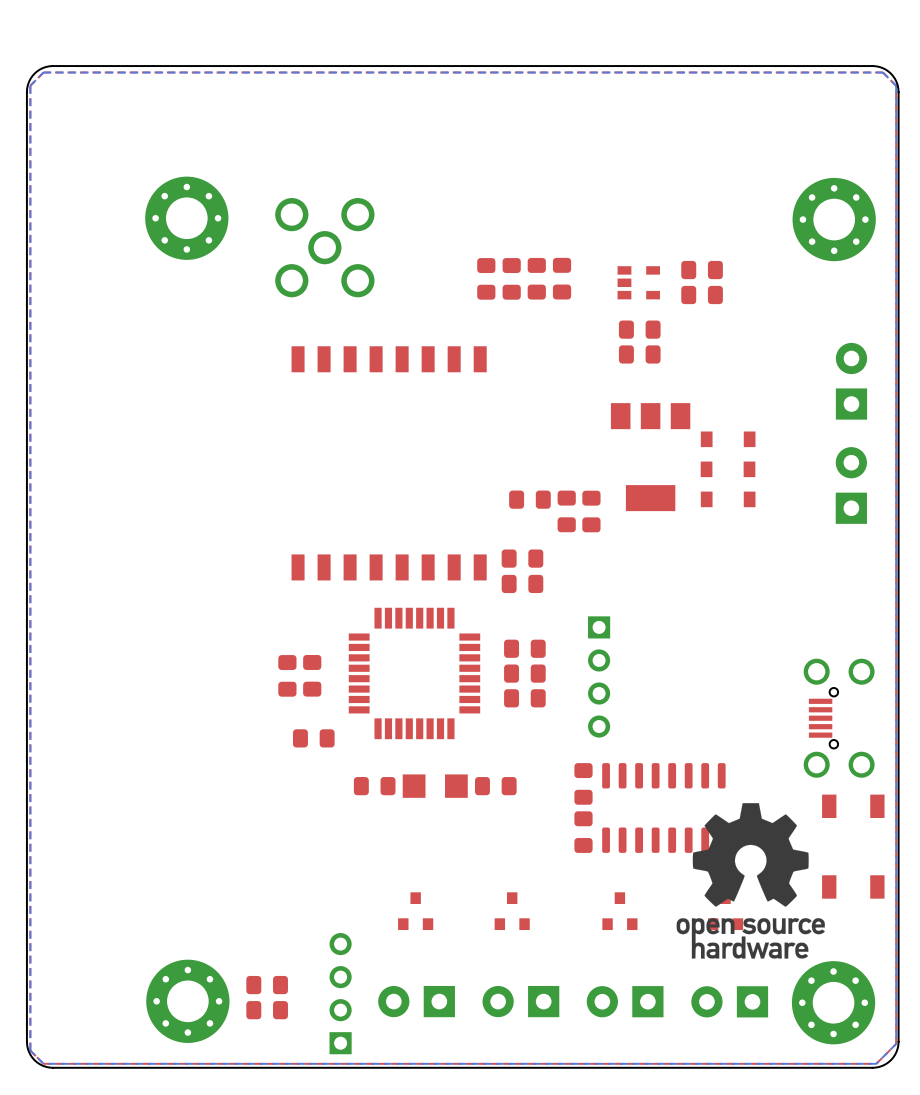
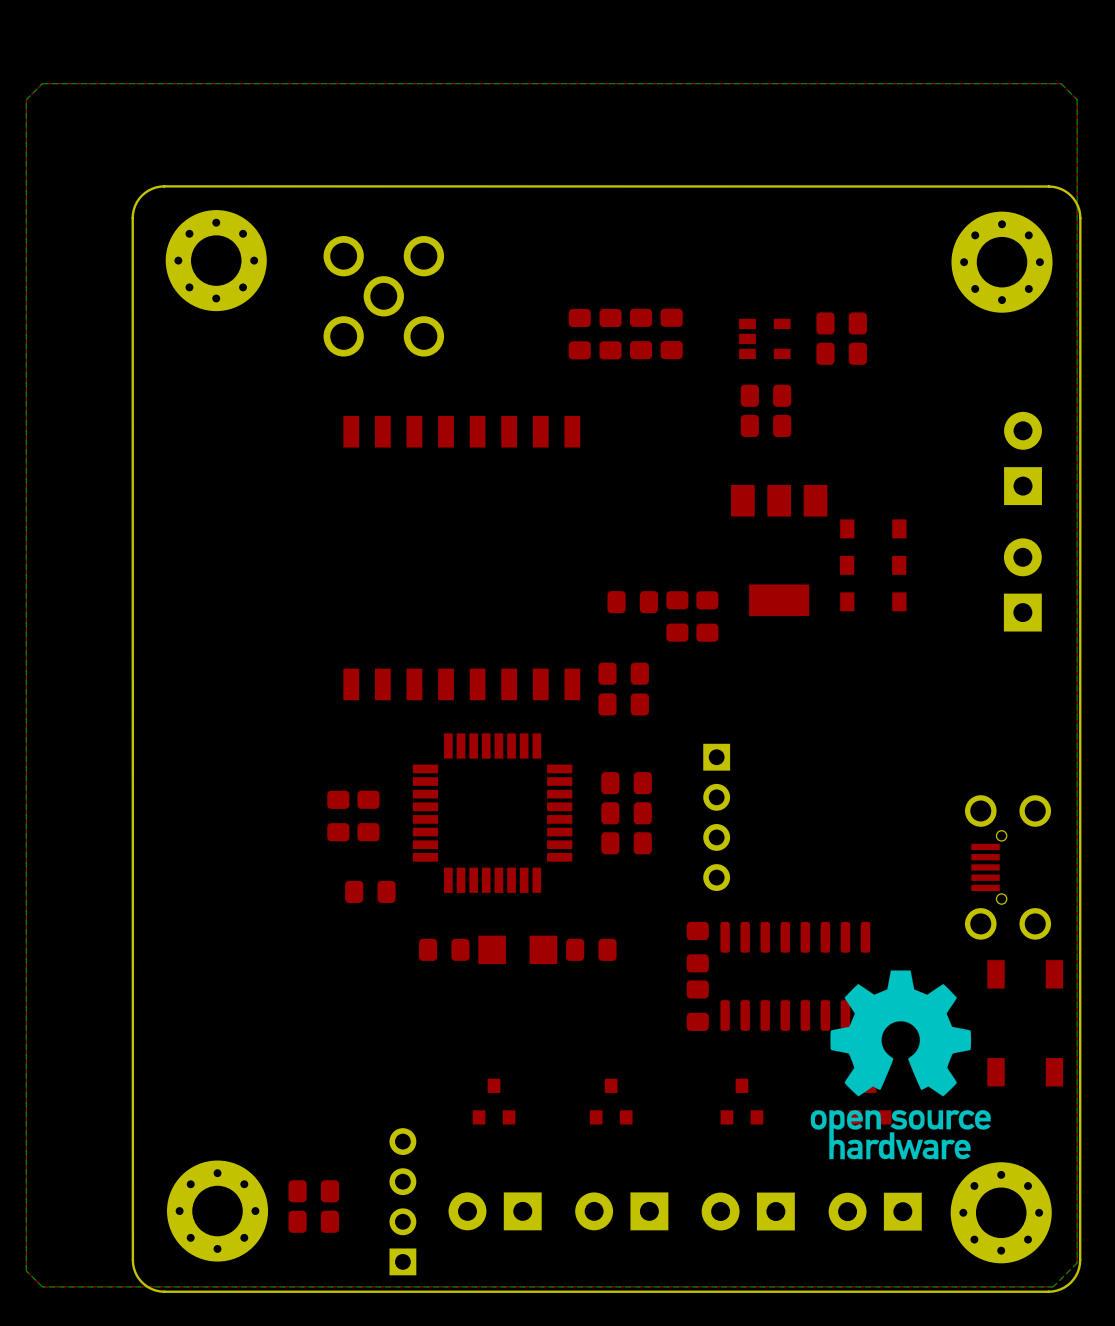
board edge: (898, 1041) (898, 92) (893, 76) (885, 69) (872, 66) (49, 66) (34, 73) (28, 82) (26, 92) (27, 1045) (34, 1060) (49, 1067) (144, 1067) -> (1080, 1260) (1080, 218) (1077, 206) (1073, 198) (1060, 188) (1048, 186) (164, 186) (152, 188) (141, 195) (135, 205) (132, 217) (132, 1260) (135, 1272) (142, 1282) (152, 1289) (164, 1291)

